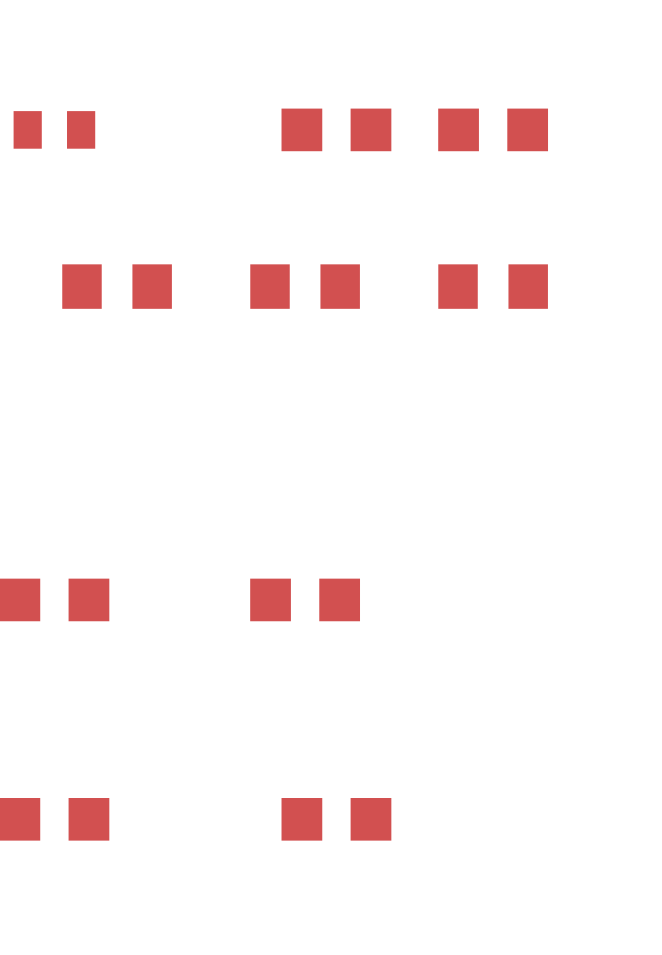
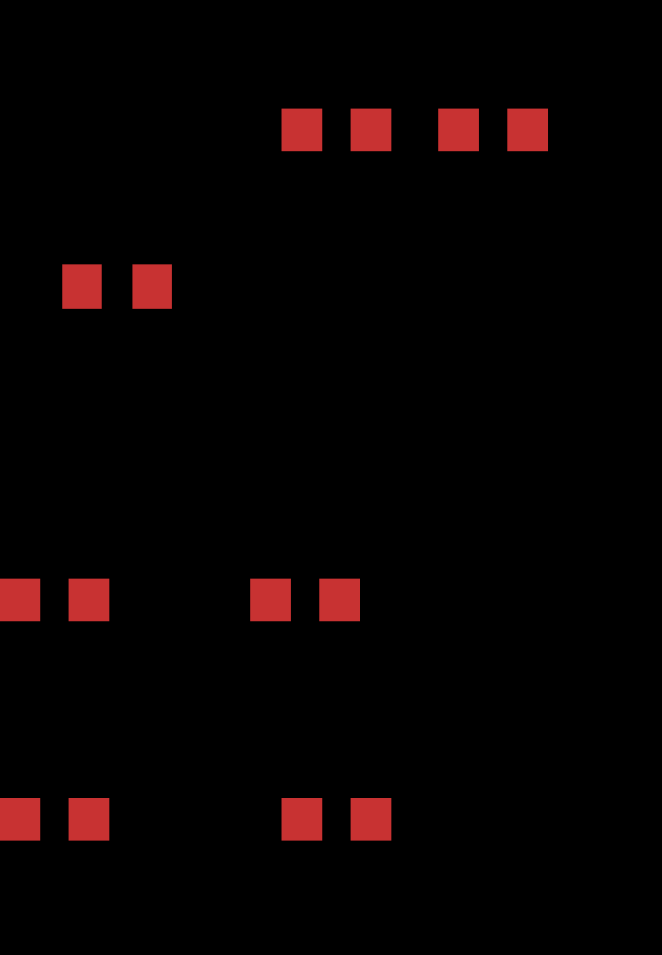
part: (54, 129) -> none
part: (305, 286) -> none
part: (493, 286) -> none

